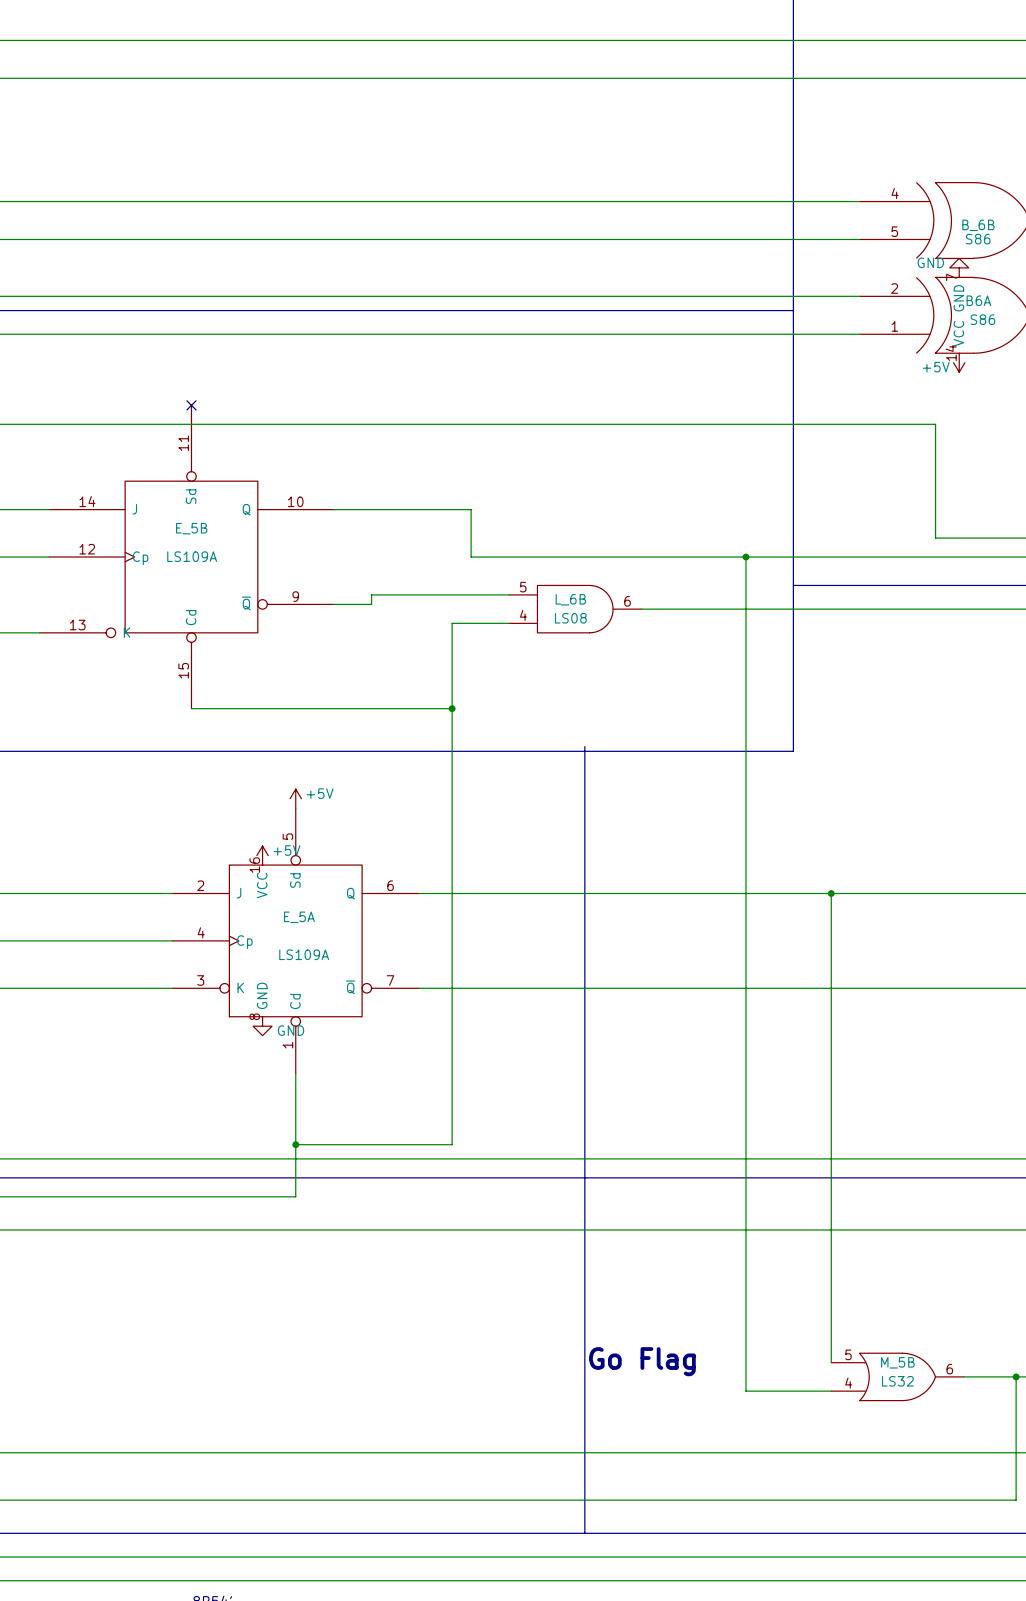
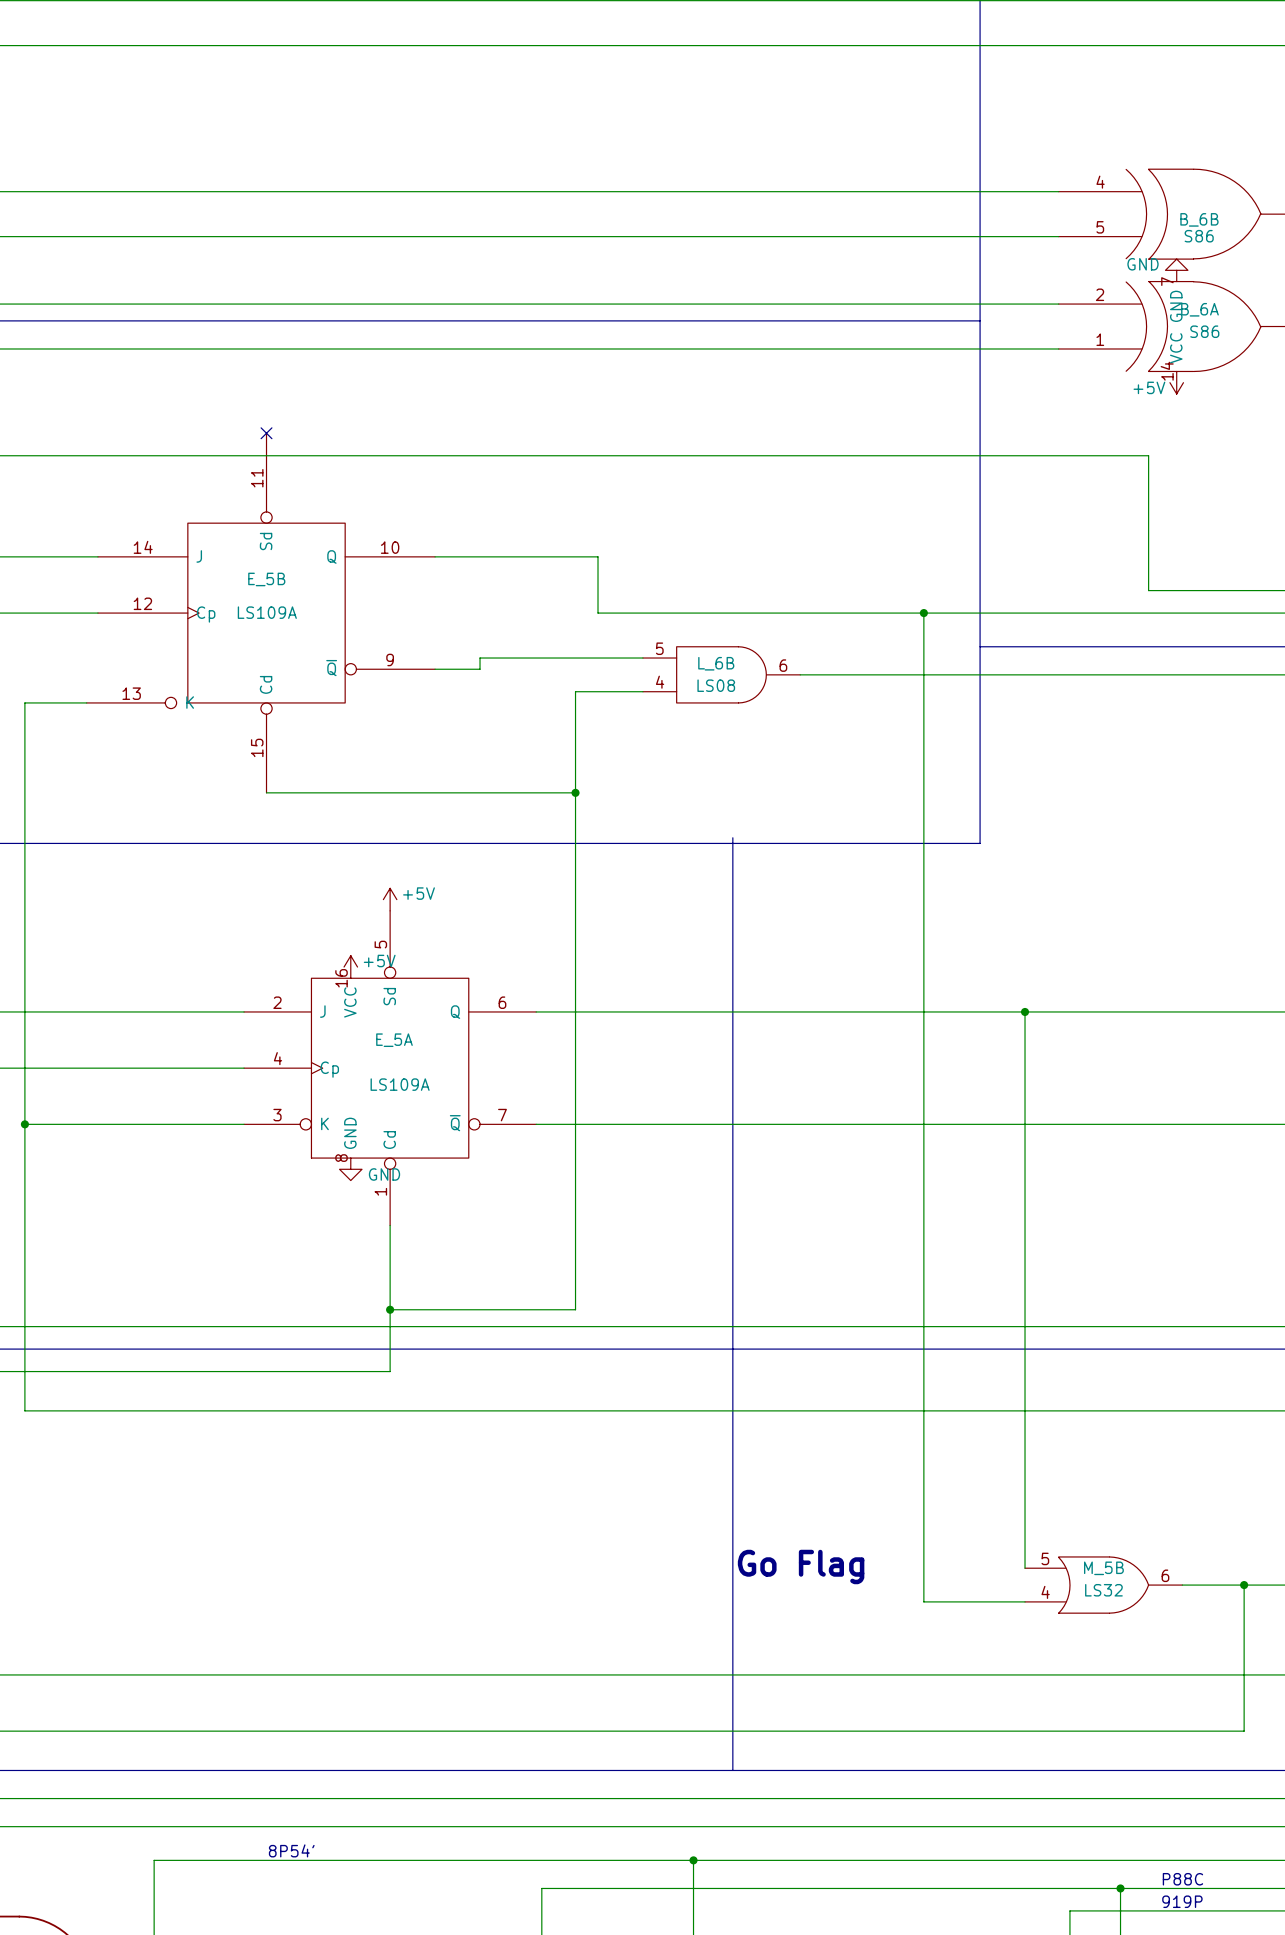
B6A name: B6A (978, 300) -> B_6A (1199, 309)

